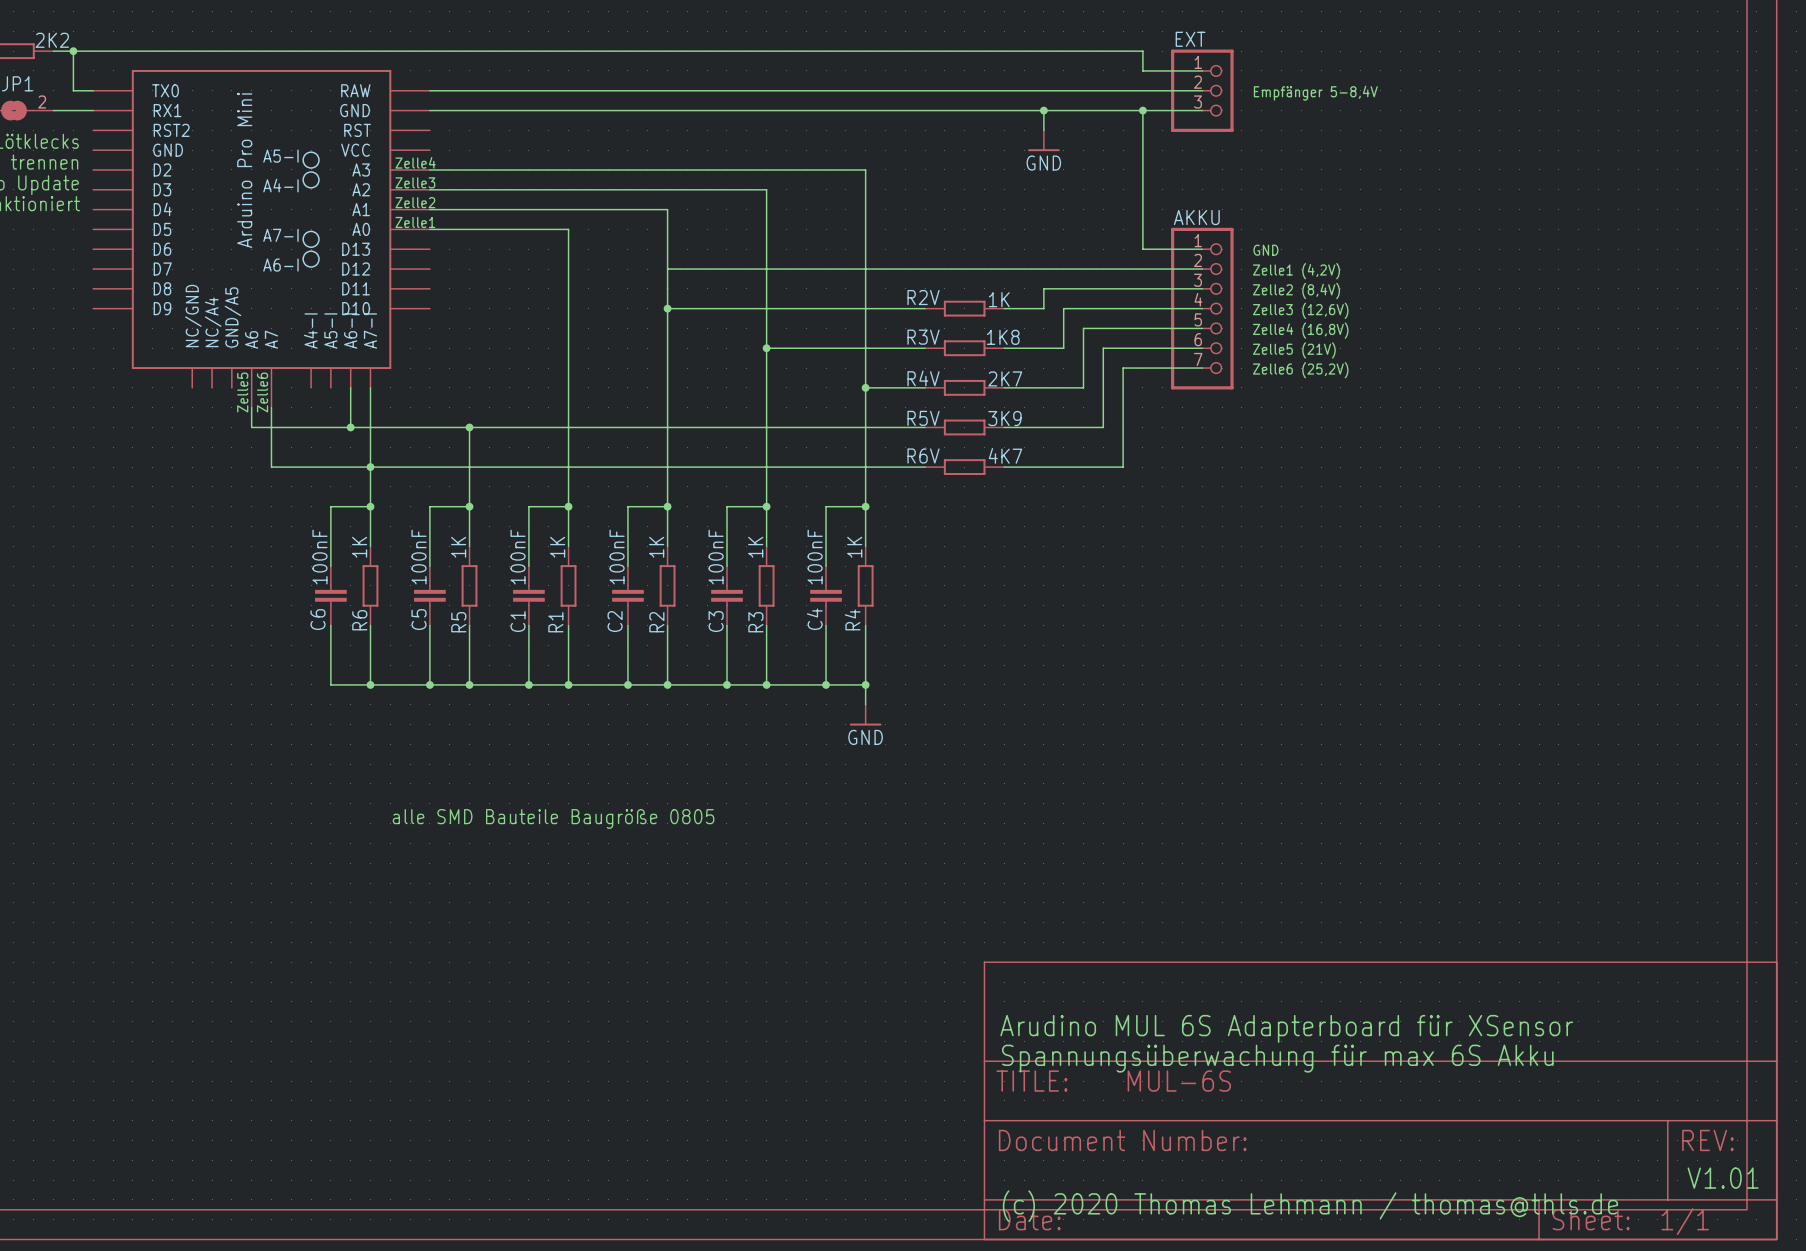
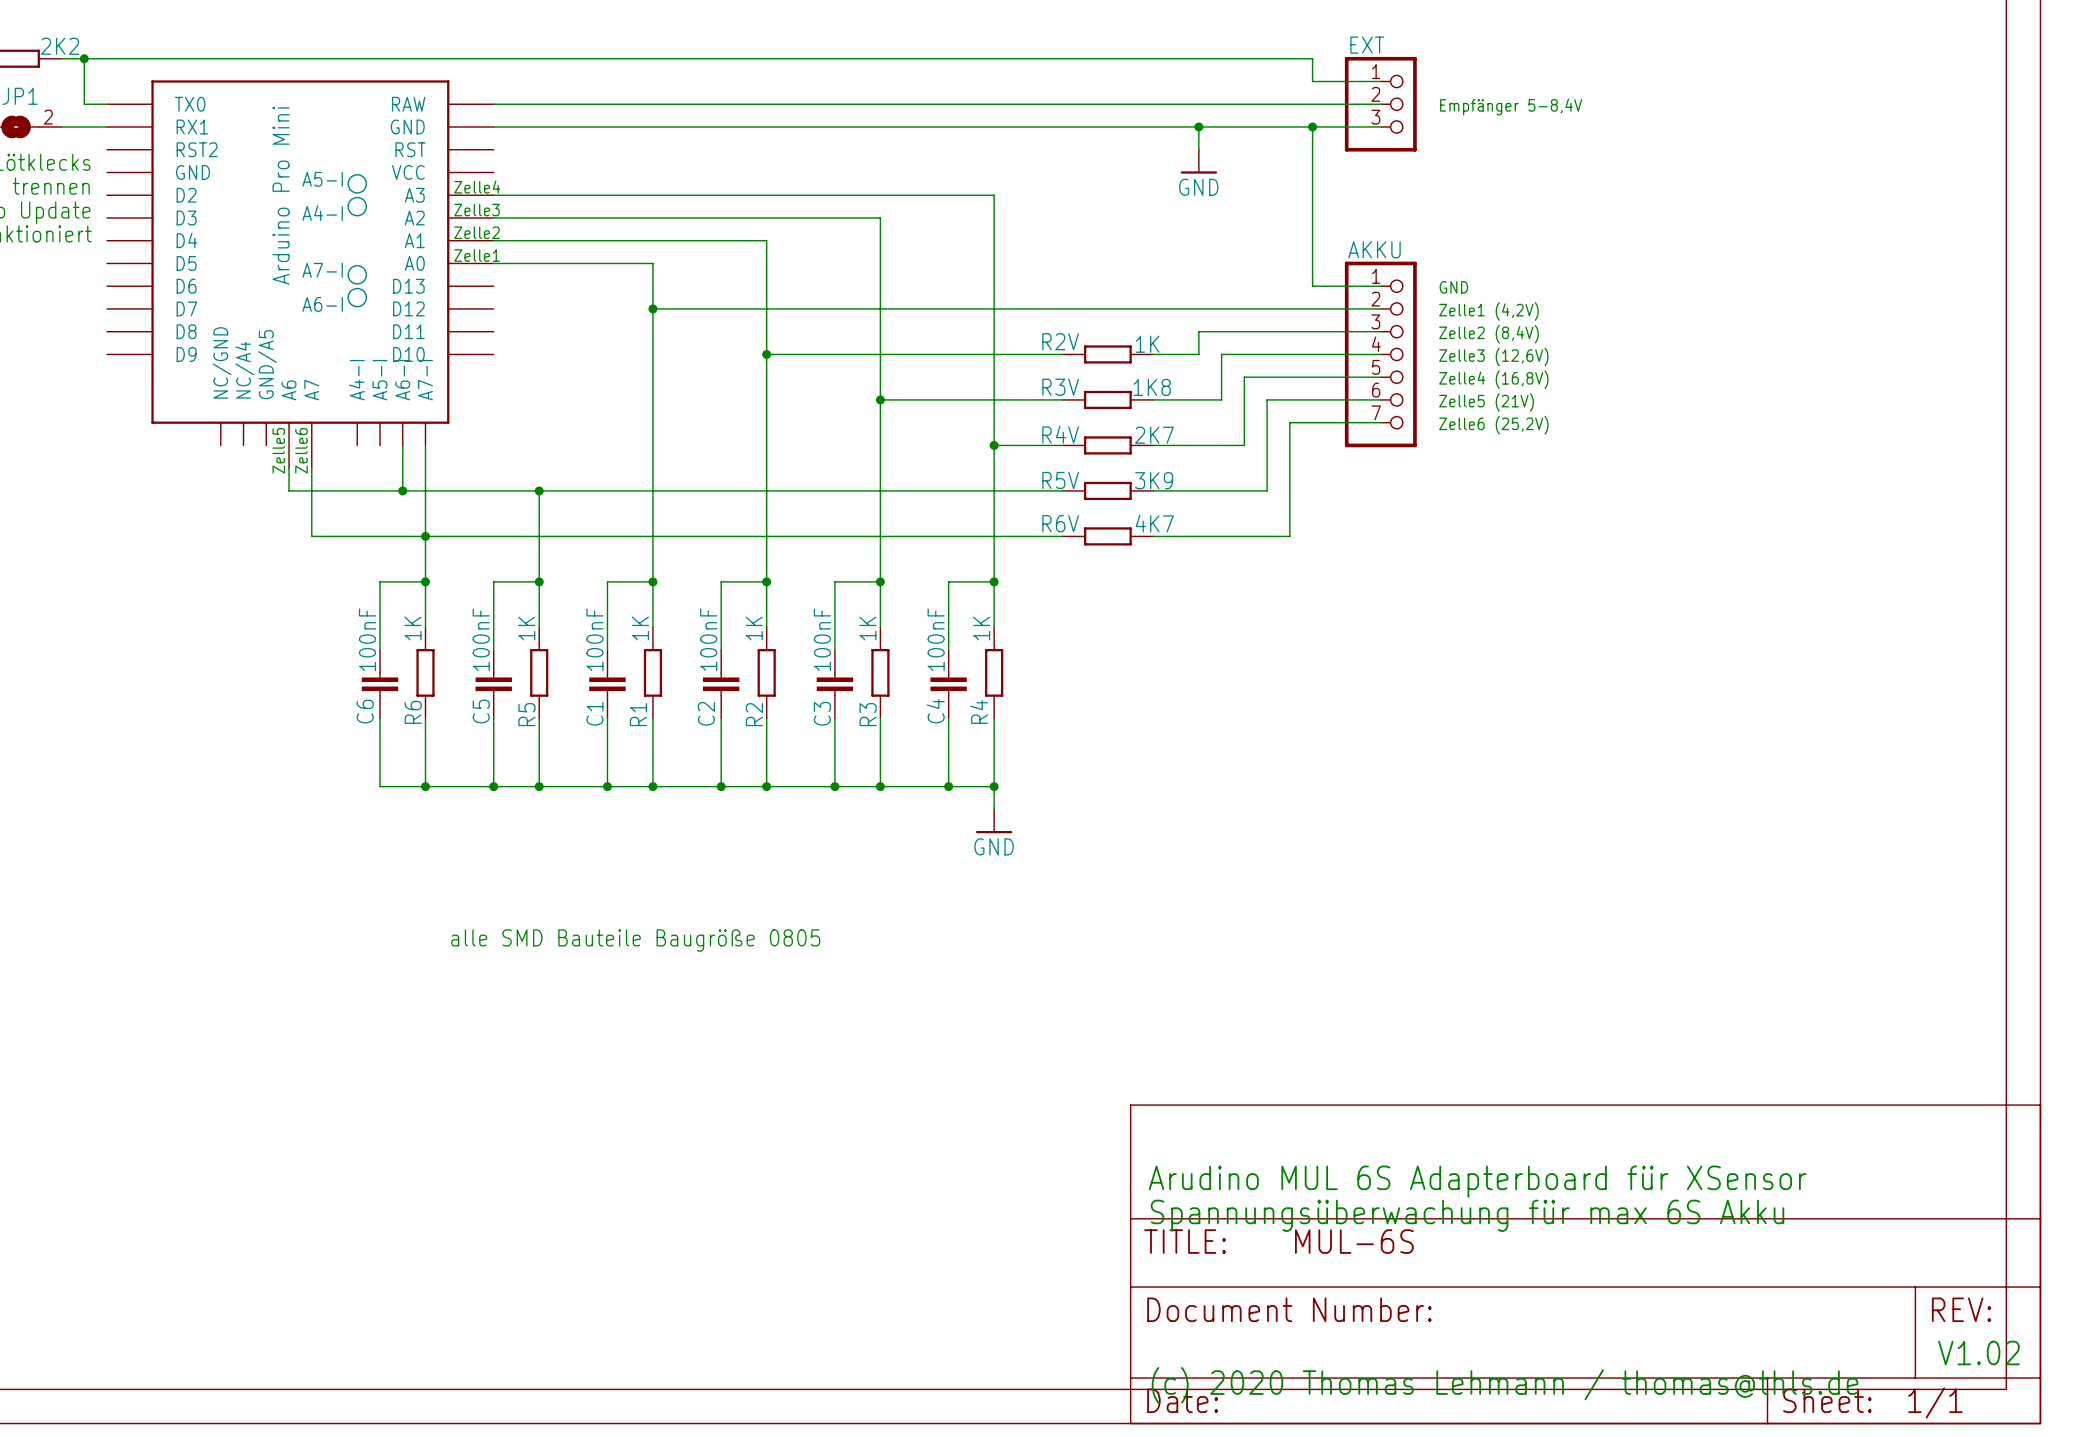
wire: none -> (652, 308) (766, 308)
junction: none -> (652, 308)
text: V1.01 (1723, 1178) -> V1.02 (1978, 1353)

